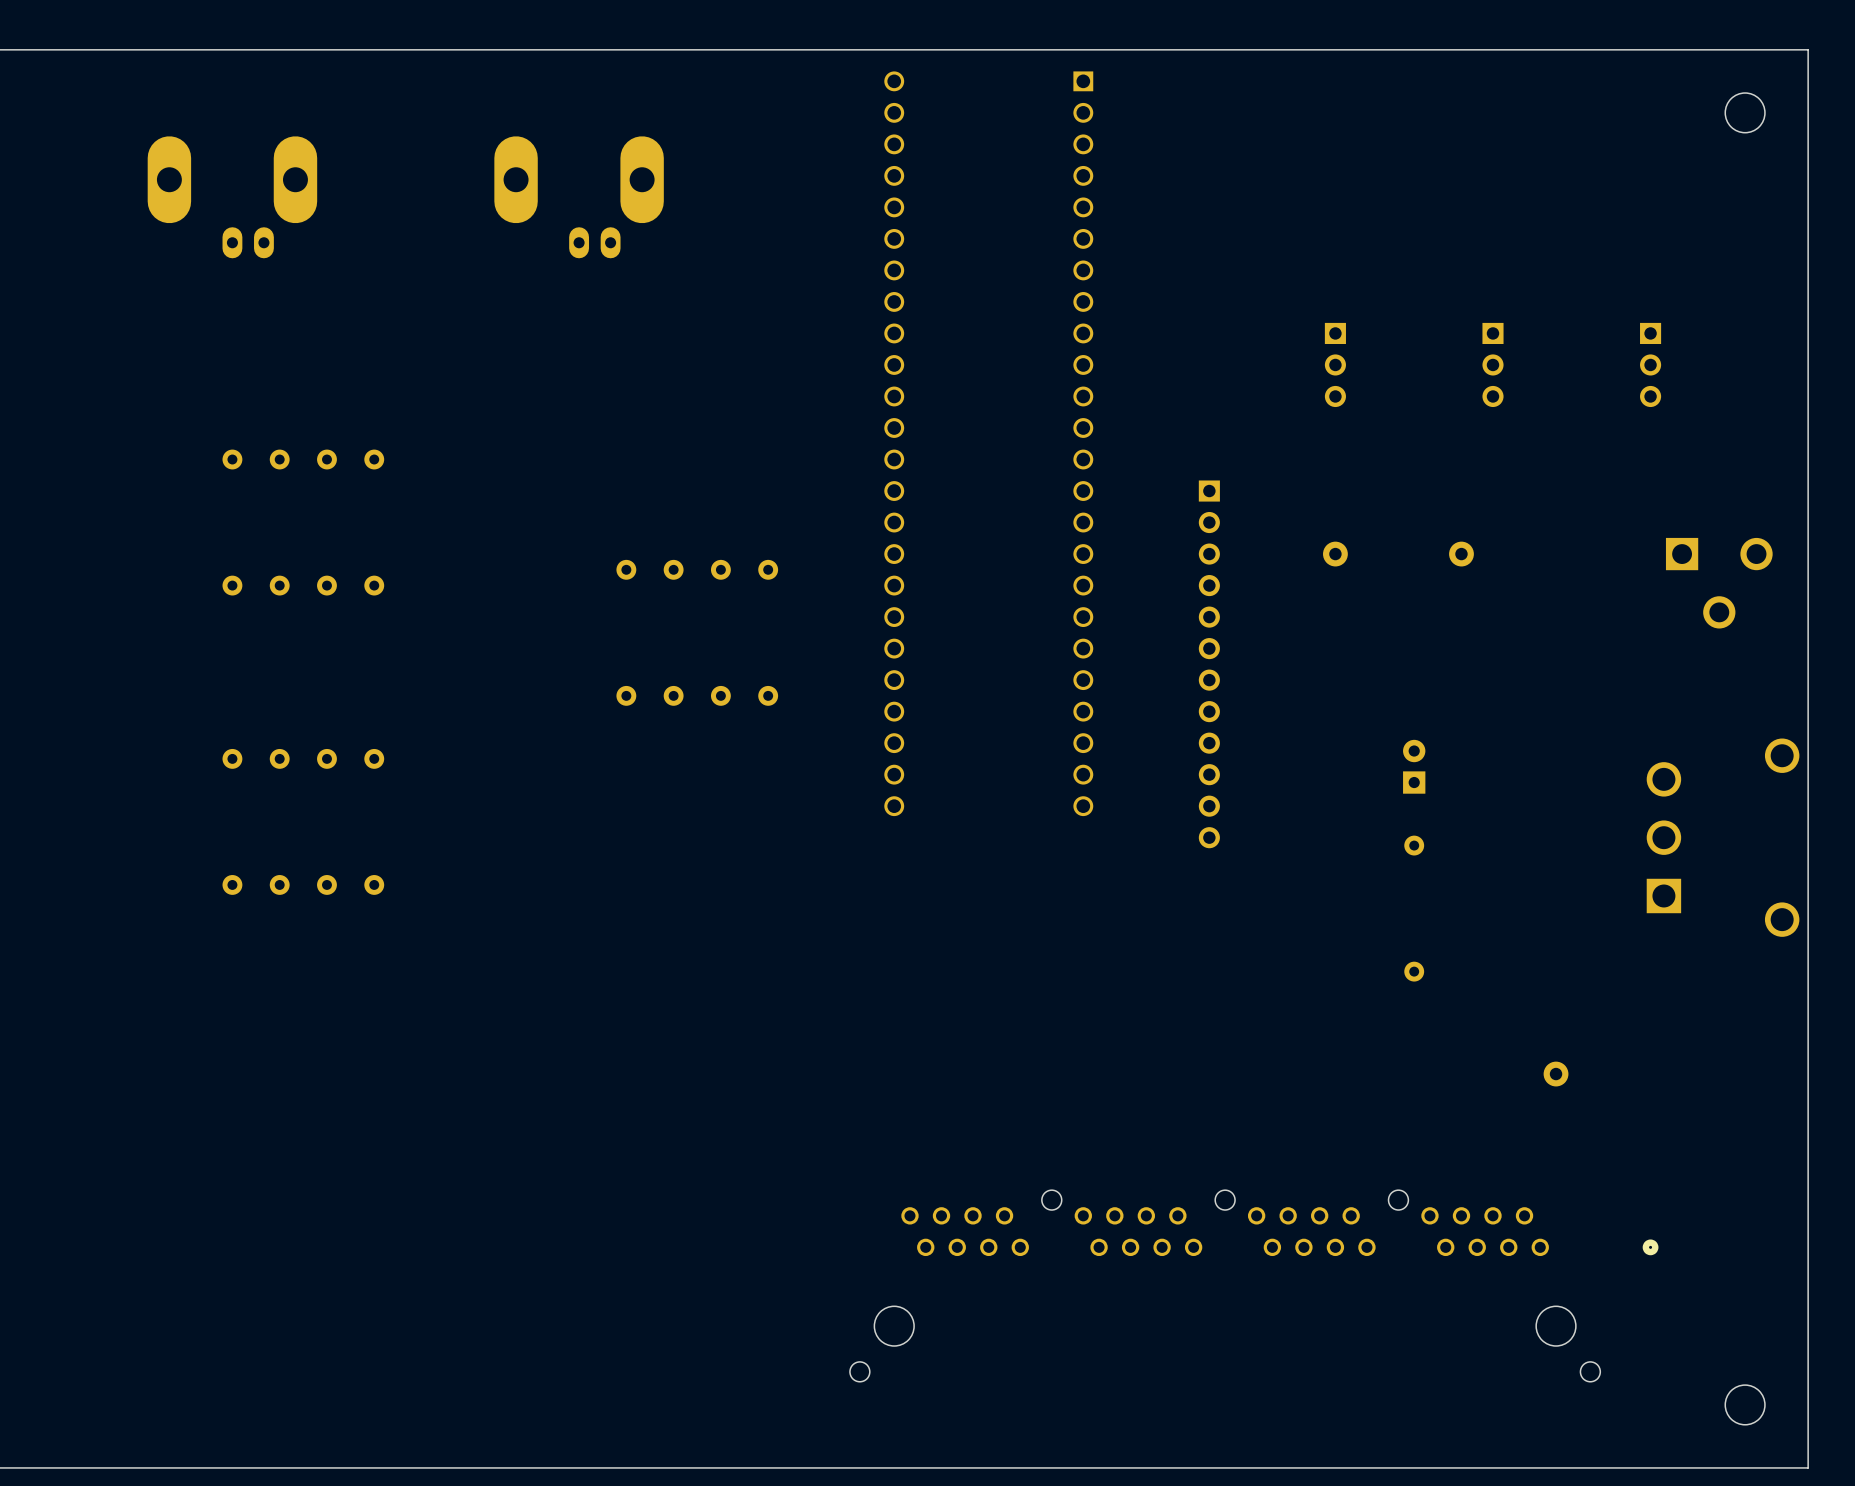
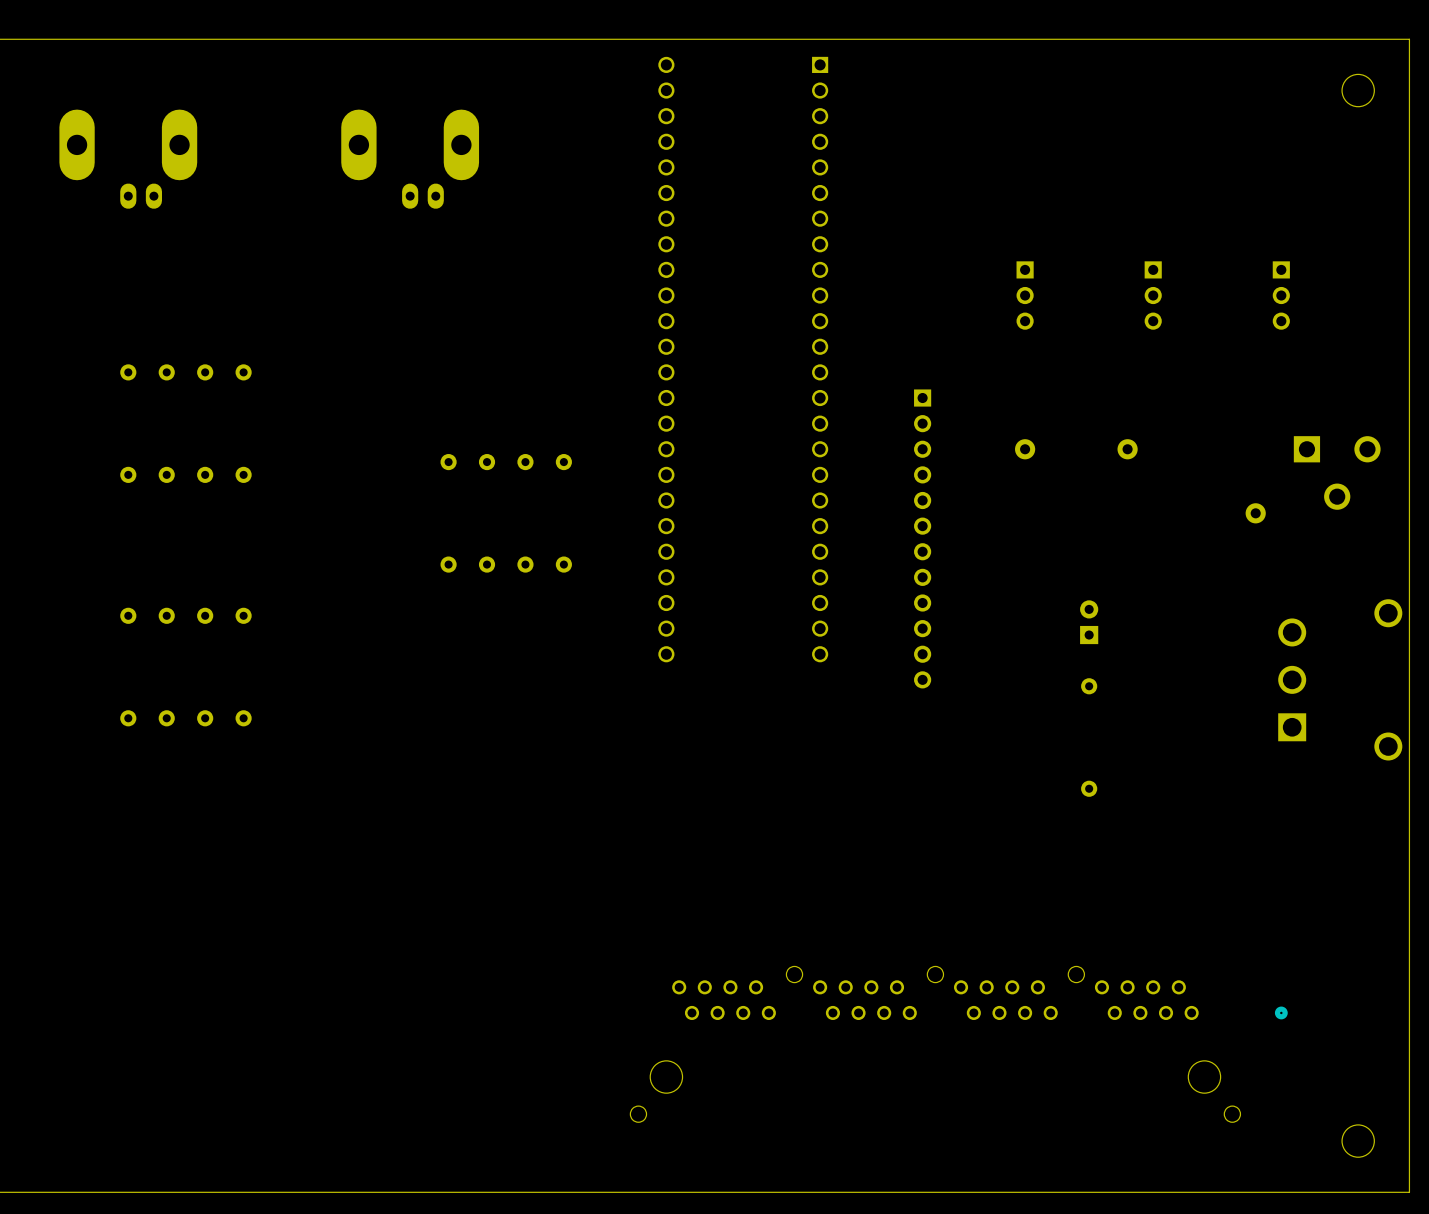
part: none -> (1255, 513)
part: (1556, 1074) -> none

